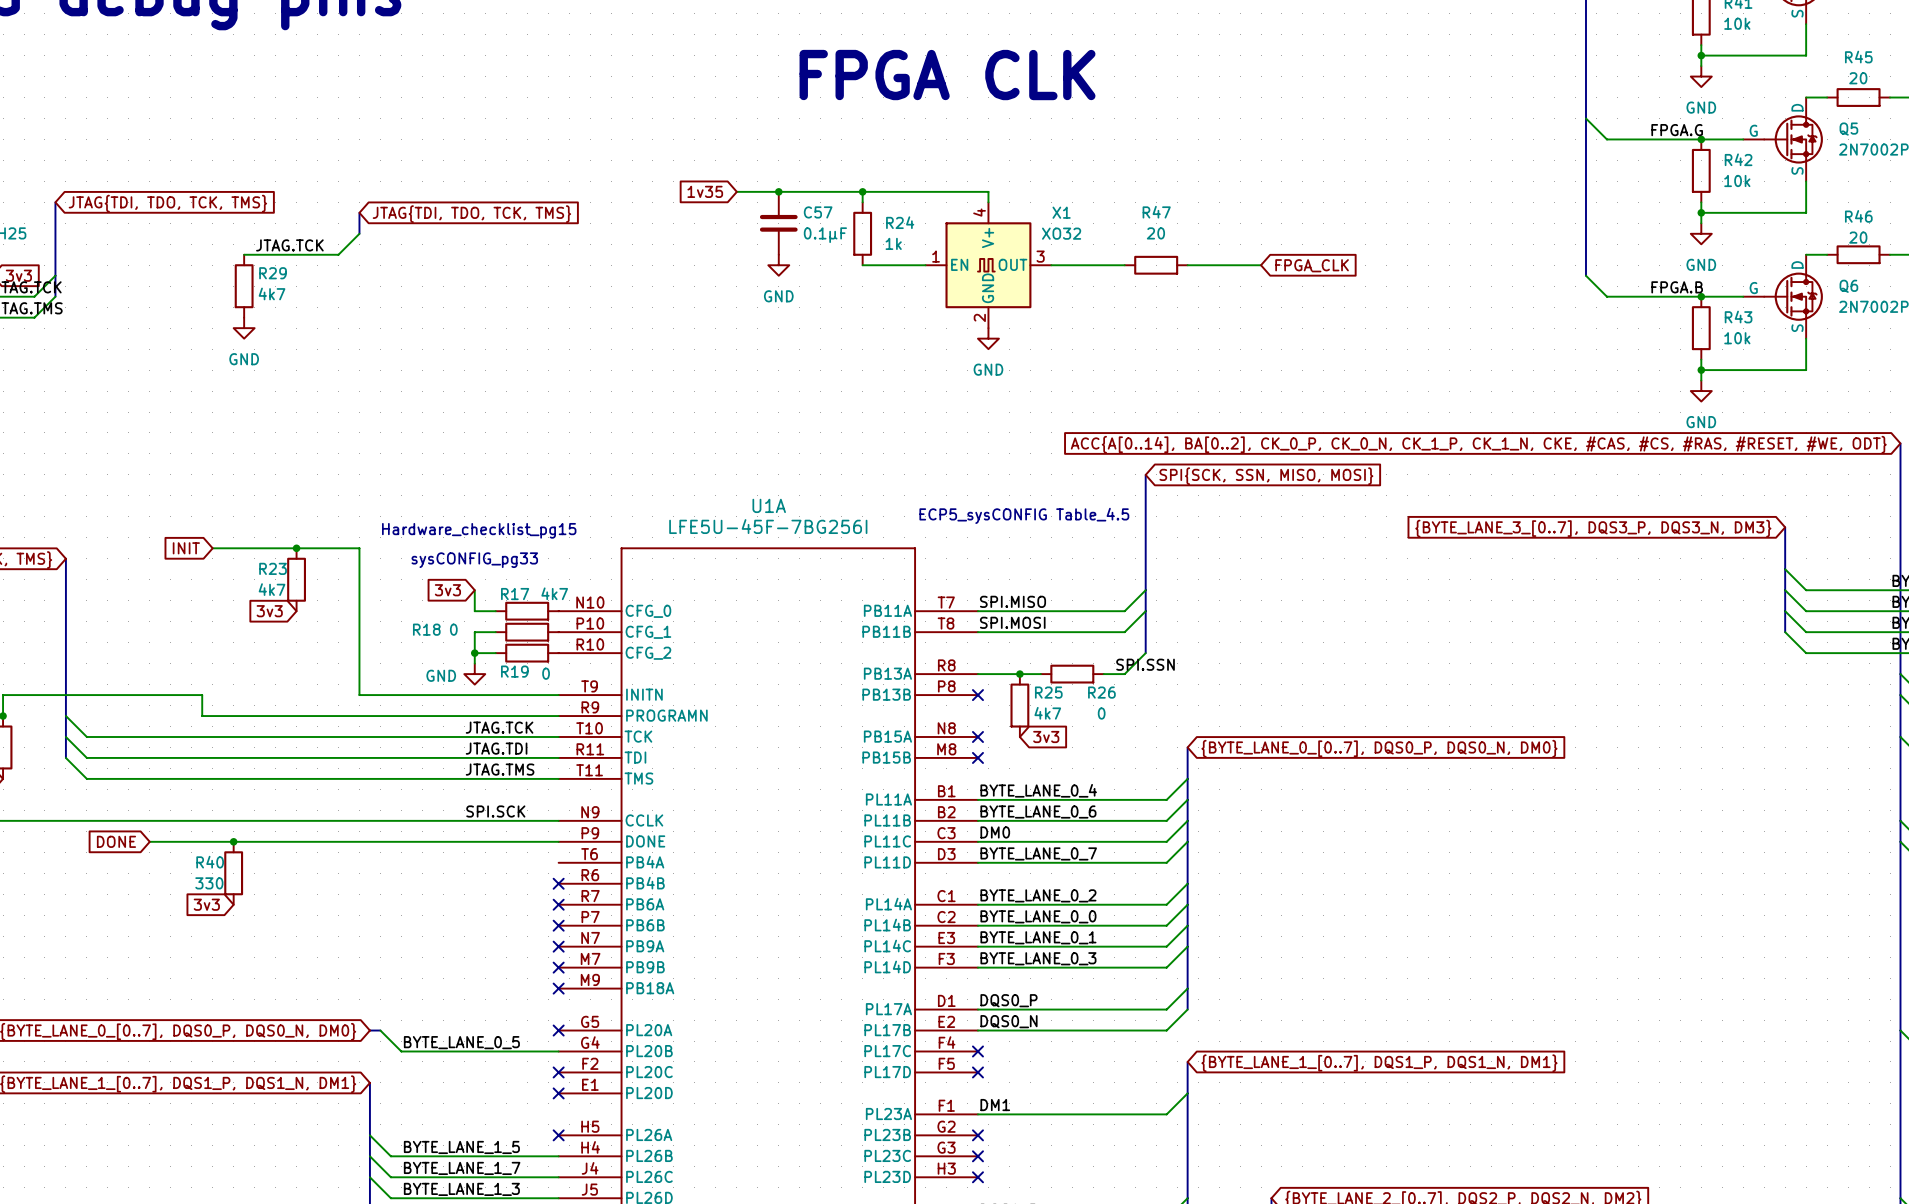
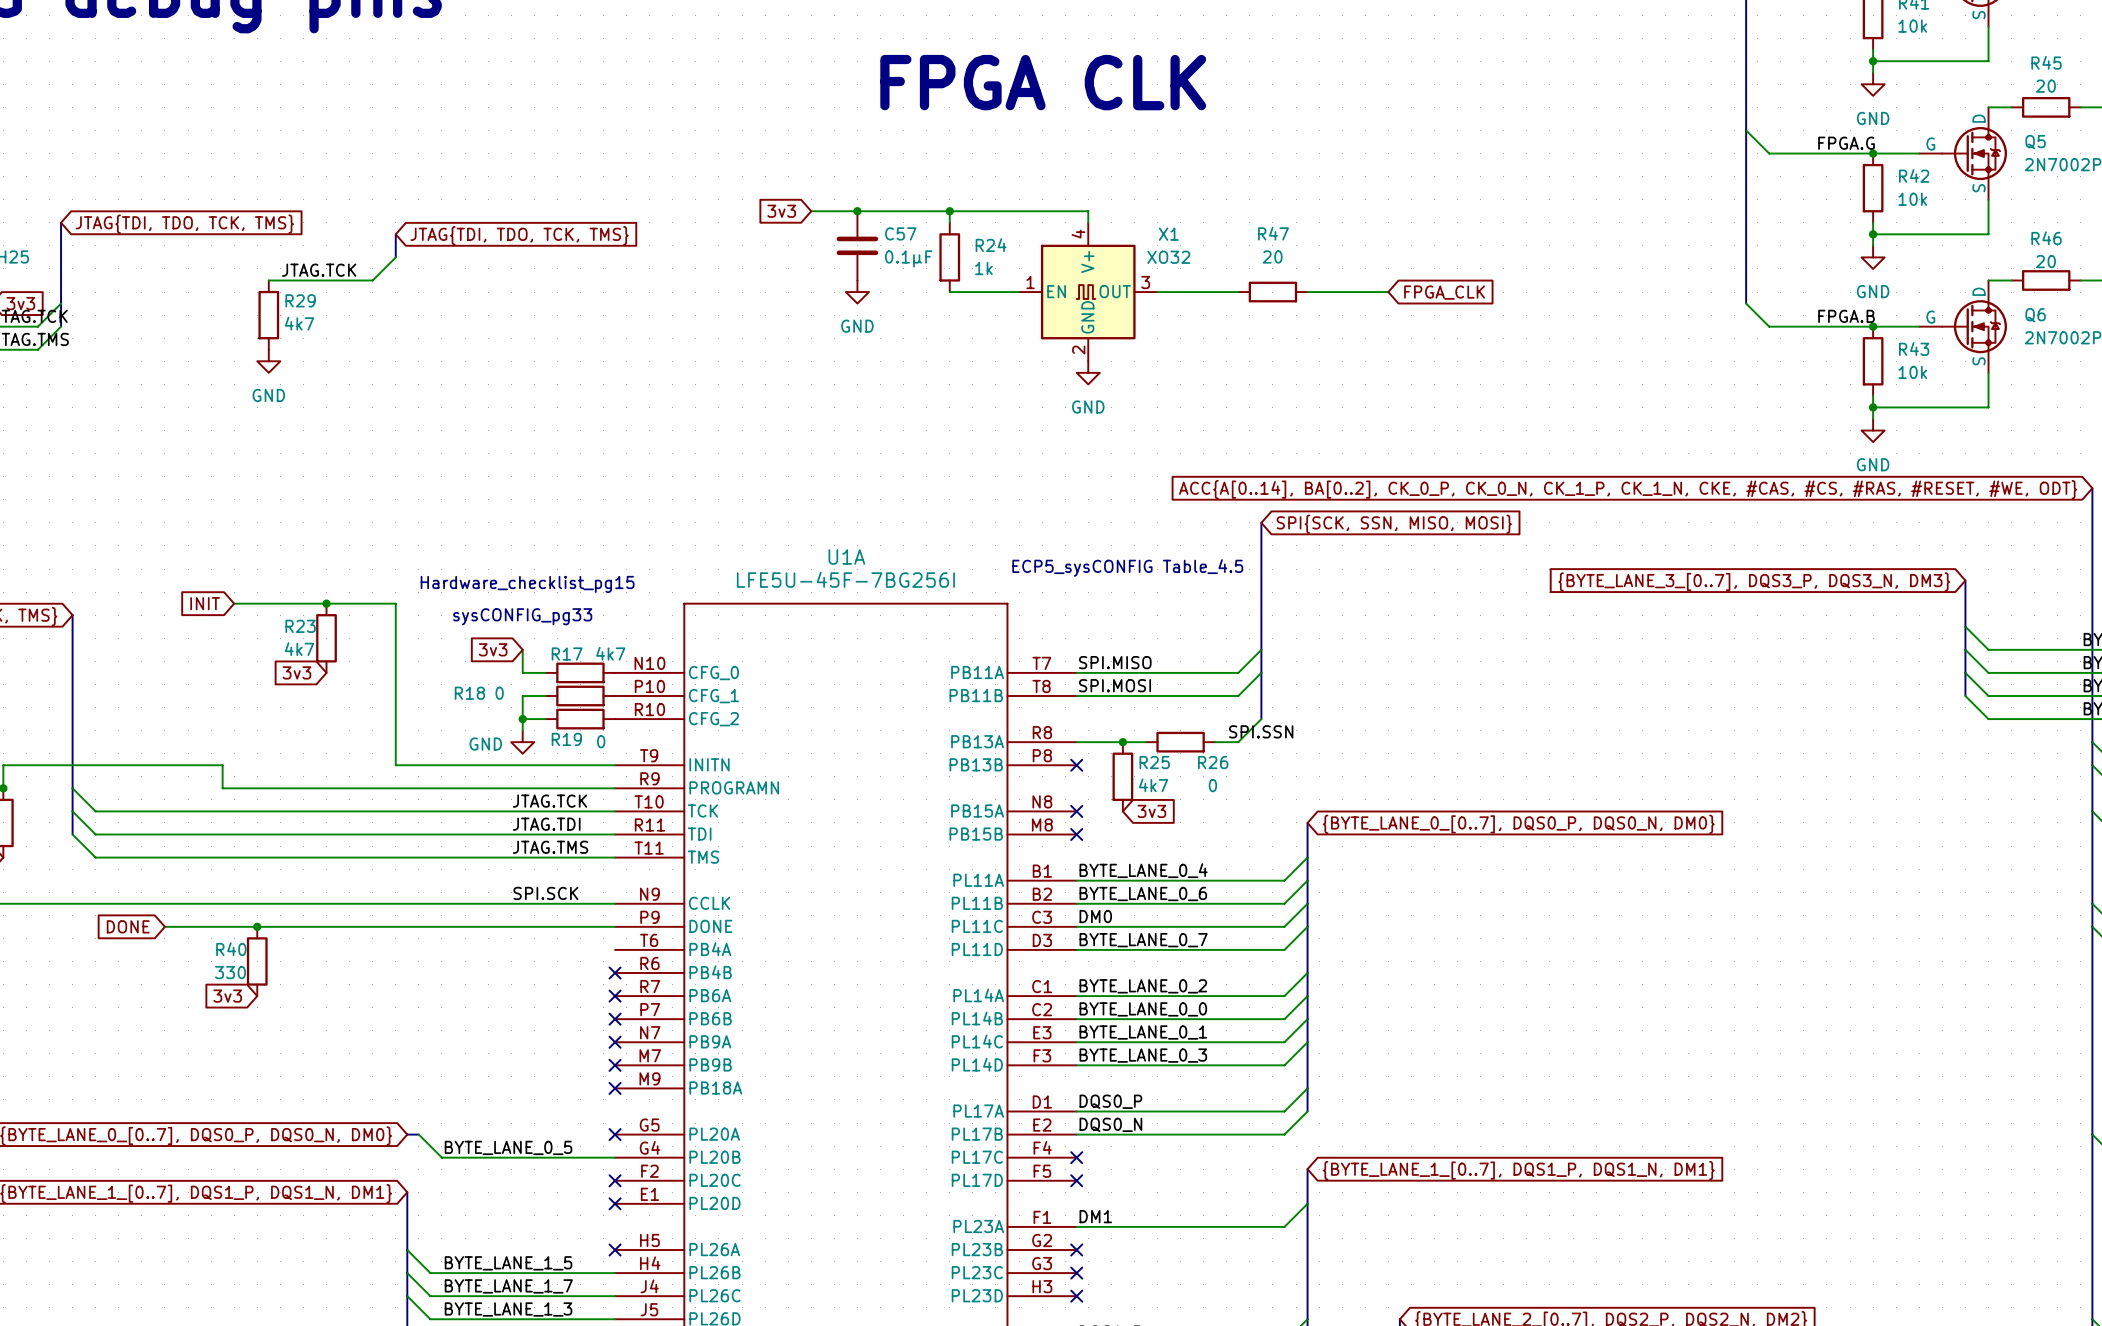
global label: 1v35 (705, 191) -> 3v3 (781, 211)

